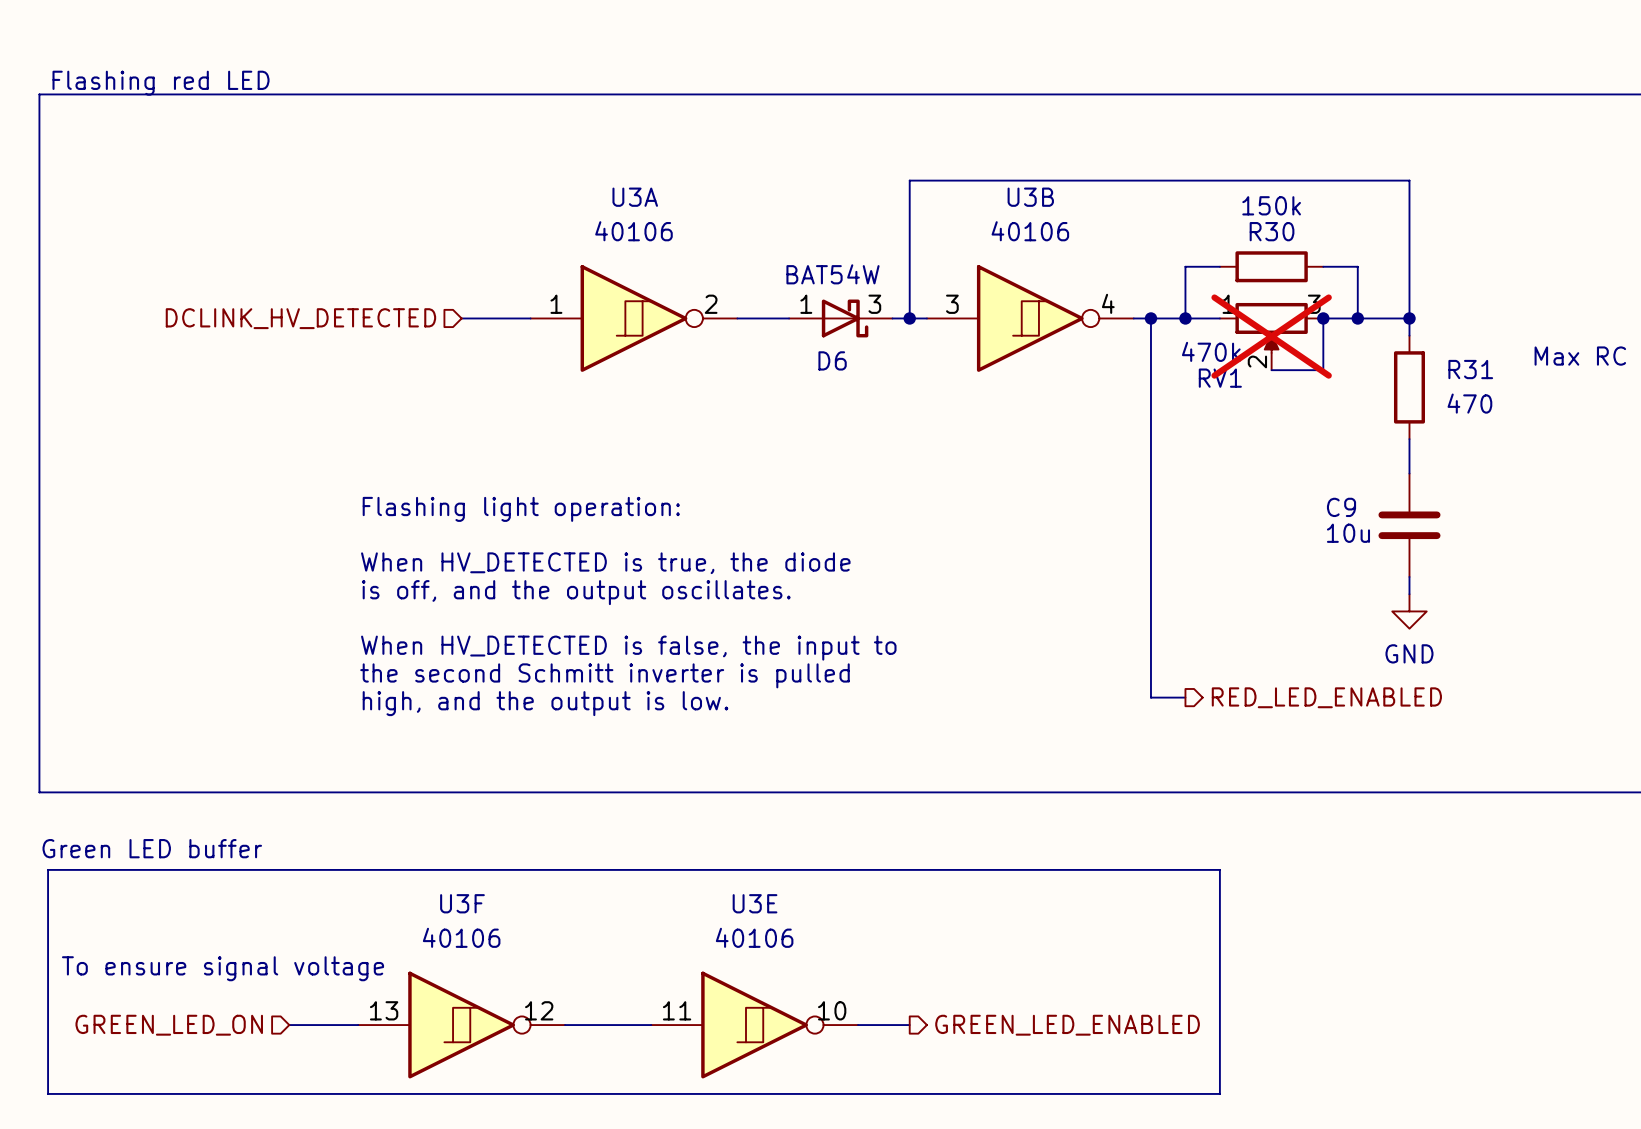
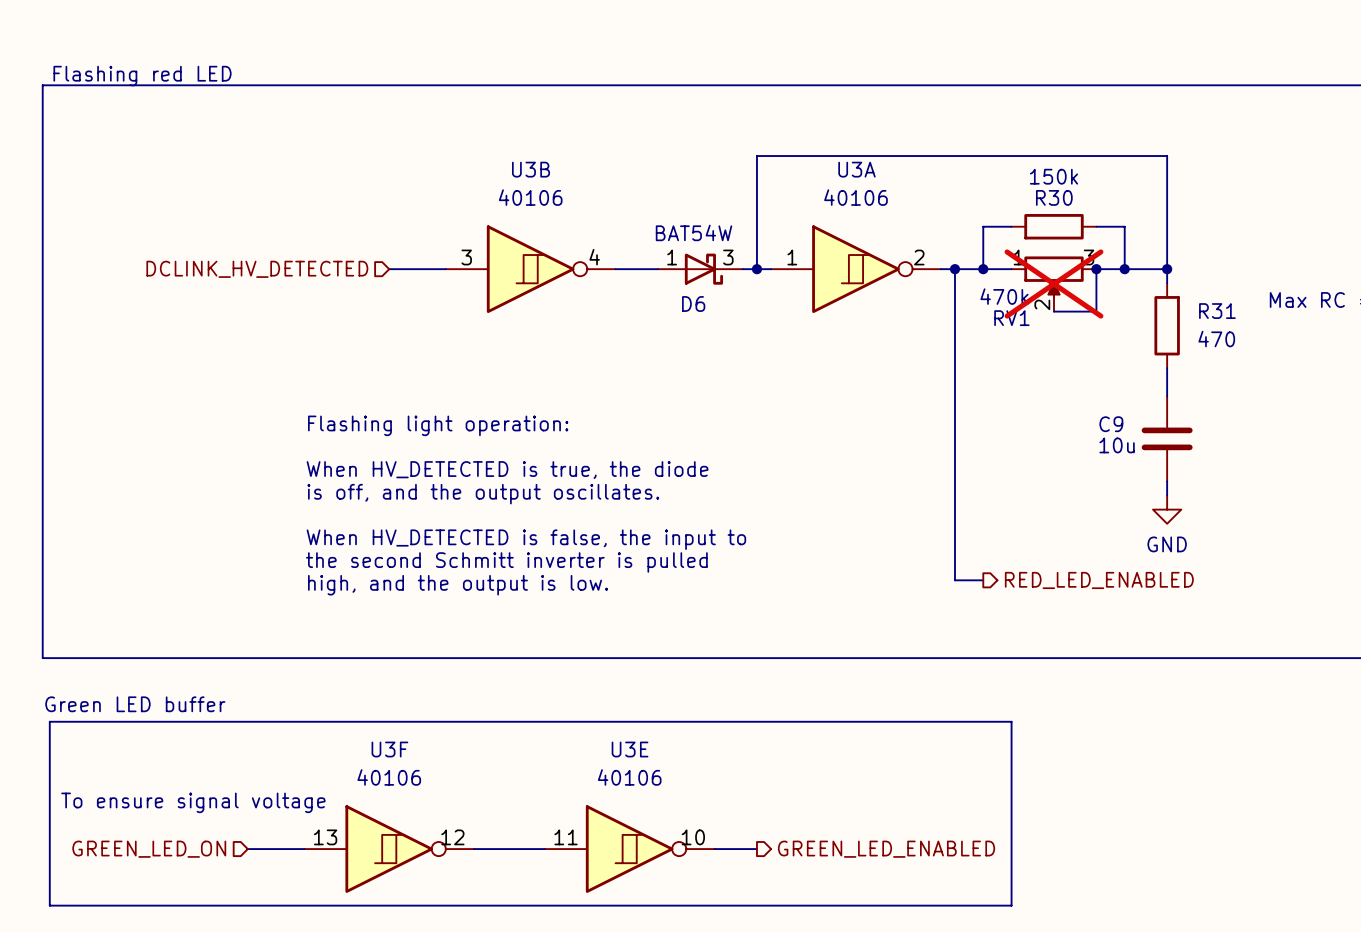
U3A position: (633, 318) -> (855, 269)
U3B position: (1030, 318) -> (530, 269)

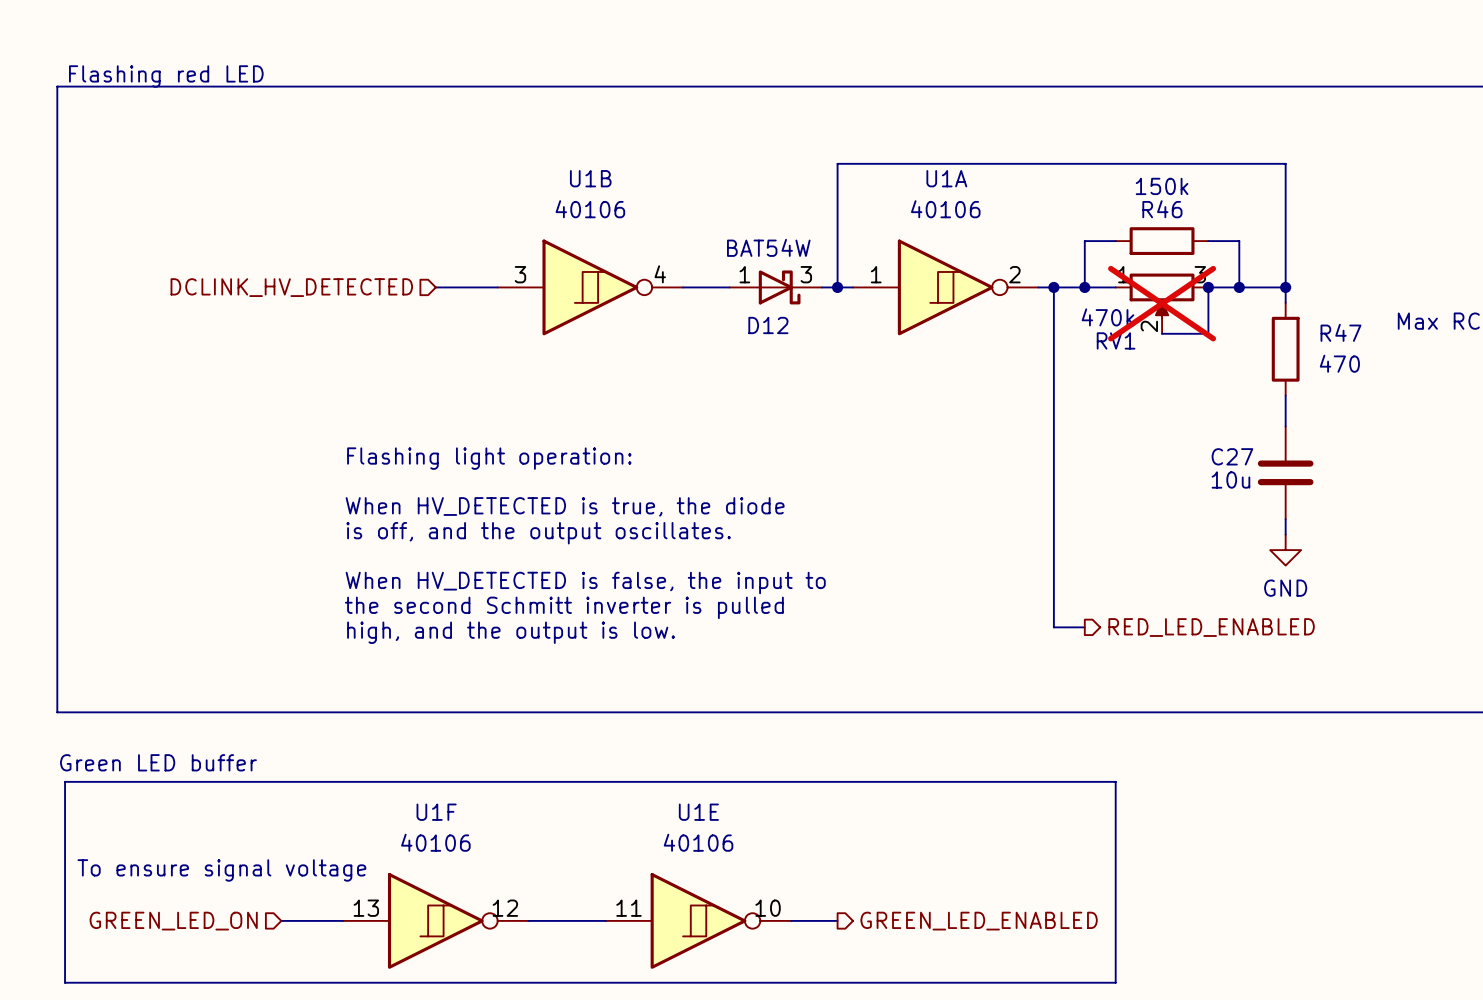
U3B name: U3B (531, 169) -> U1B (590, 178)
U3A name: U3A (856, 169) -> U1A (946, 178)
R30 name: R30 (1054, 197) -> R46 (1162, 209)
D6 name: D6 (693, 303) -> D12 (768, 325)
R31 name: R31 (1217, 311) -> R47 (1340, 332)
C9 name: C9 (1111, 424) -> C27 (1232, 456)
U3F name: U3F (389, 749) -> U1F (436, 812)
U3E name: U3E (630, 749) -> U1E (698, 812)

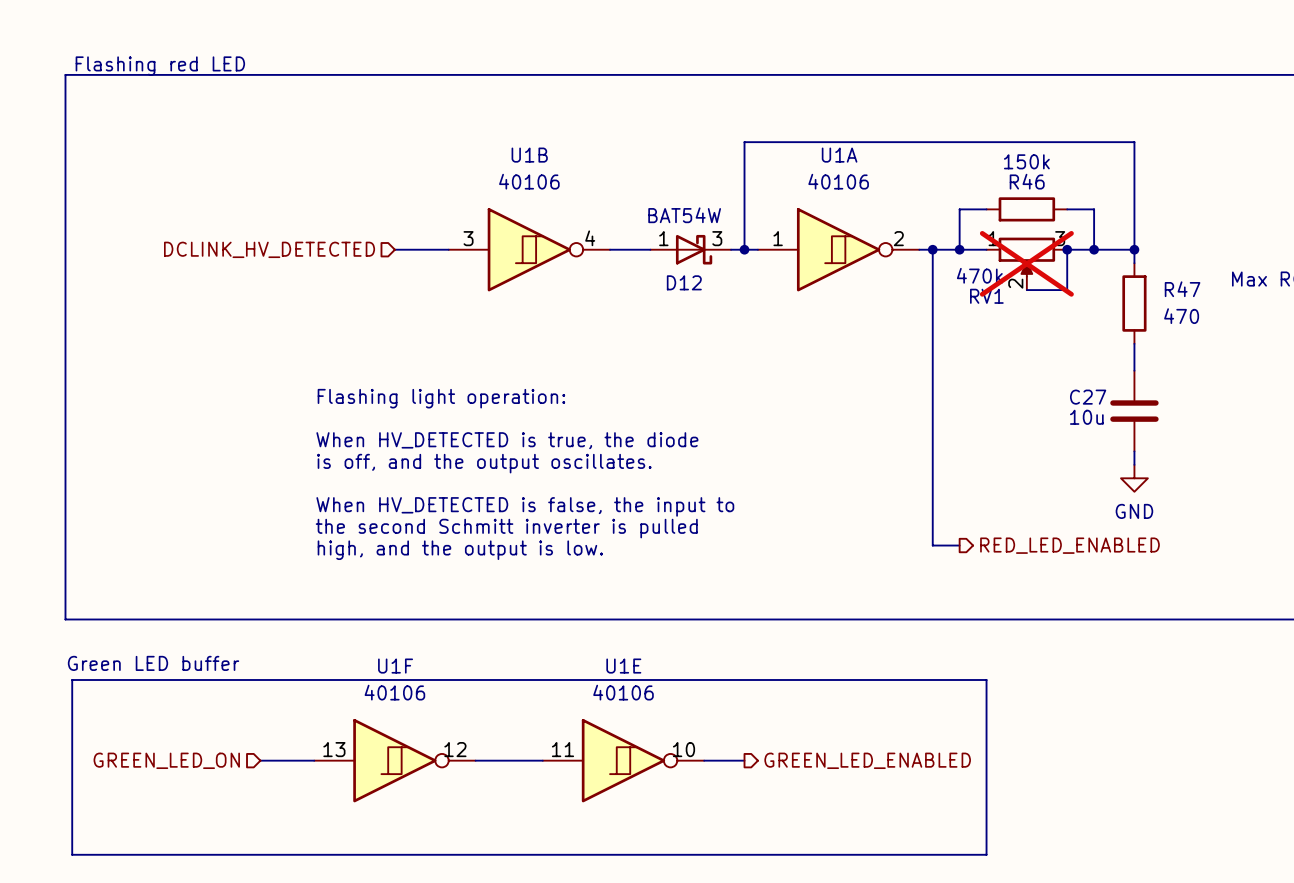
text: To ensure signal voltage (221, 870) -> none
wire: (281, 920) (343, 920) -> (260, 760) (314, 760)
U1F position: (435, 920) -> (394, 760)
wire: (528, 920) (605, 920) -> (475, 760) (542, 760)
U1E position: (698, 920) -> (623, 760)
wire: (791, 920) (837, 920) -> (704, 760) (744, 760)
hierarchical label position: GREEN_LED_ON (173, 921) -> GREEN_LED_ON (166, 760)
hierarchical label position: GREEN_LED_ENABLED (979, 921) -> GREEN_LED_ENABLED (867, 760)

